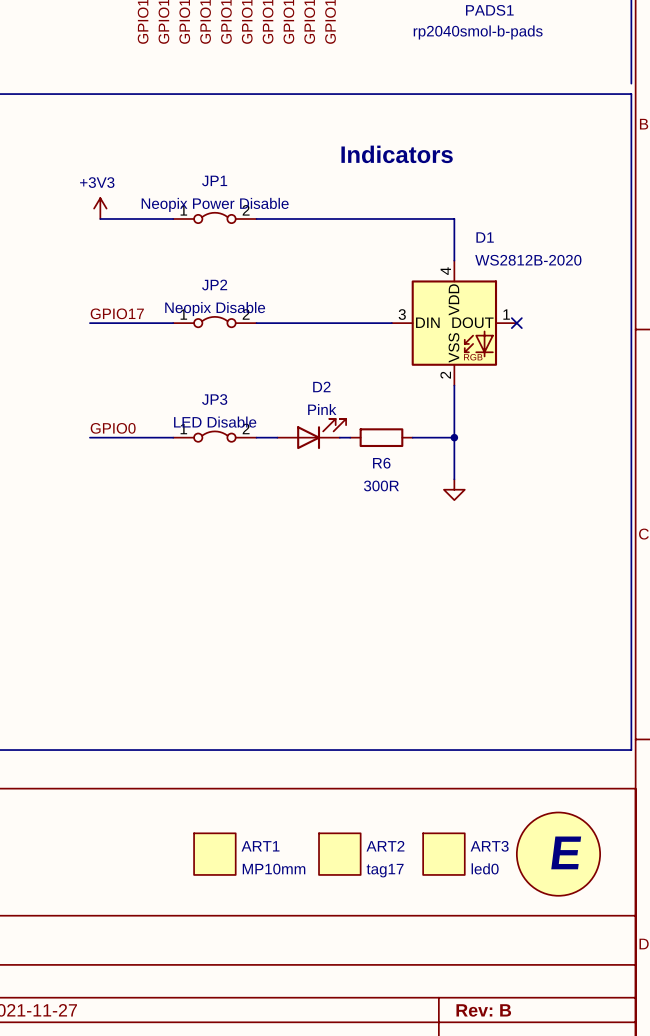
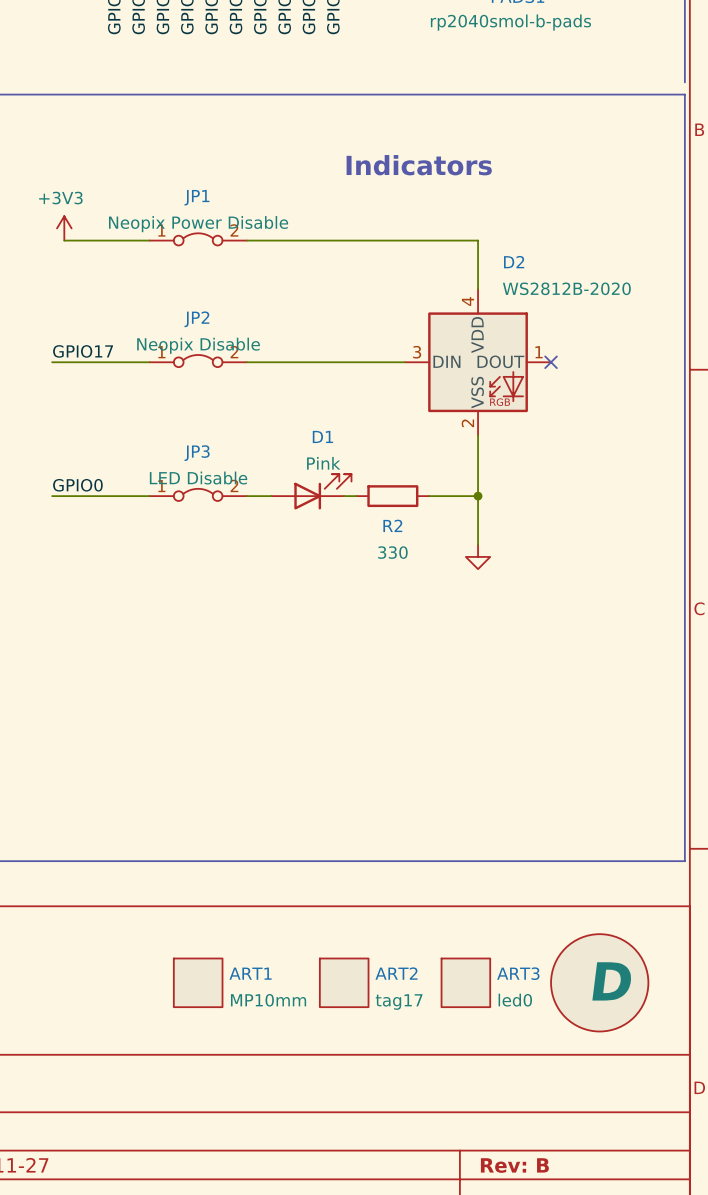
D1 name: D1 (485, 237) -> D2 (514, 262)
D2 name: D2 (321, 386) -> D1 (322, 436)
R6 name: R6 (381, 463) -> R2 (392, 525)
R6 value: 300R (381, 485) -> 330 (392, 552)
part value: E (566, 852) -> D (611, 981)

